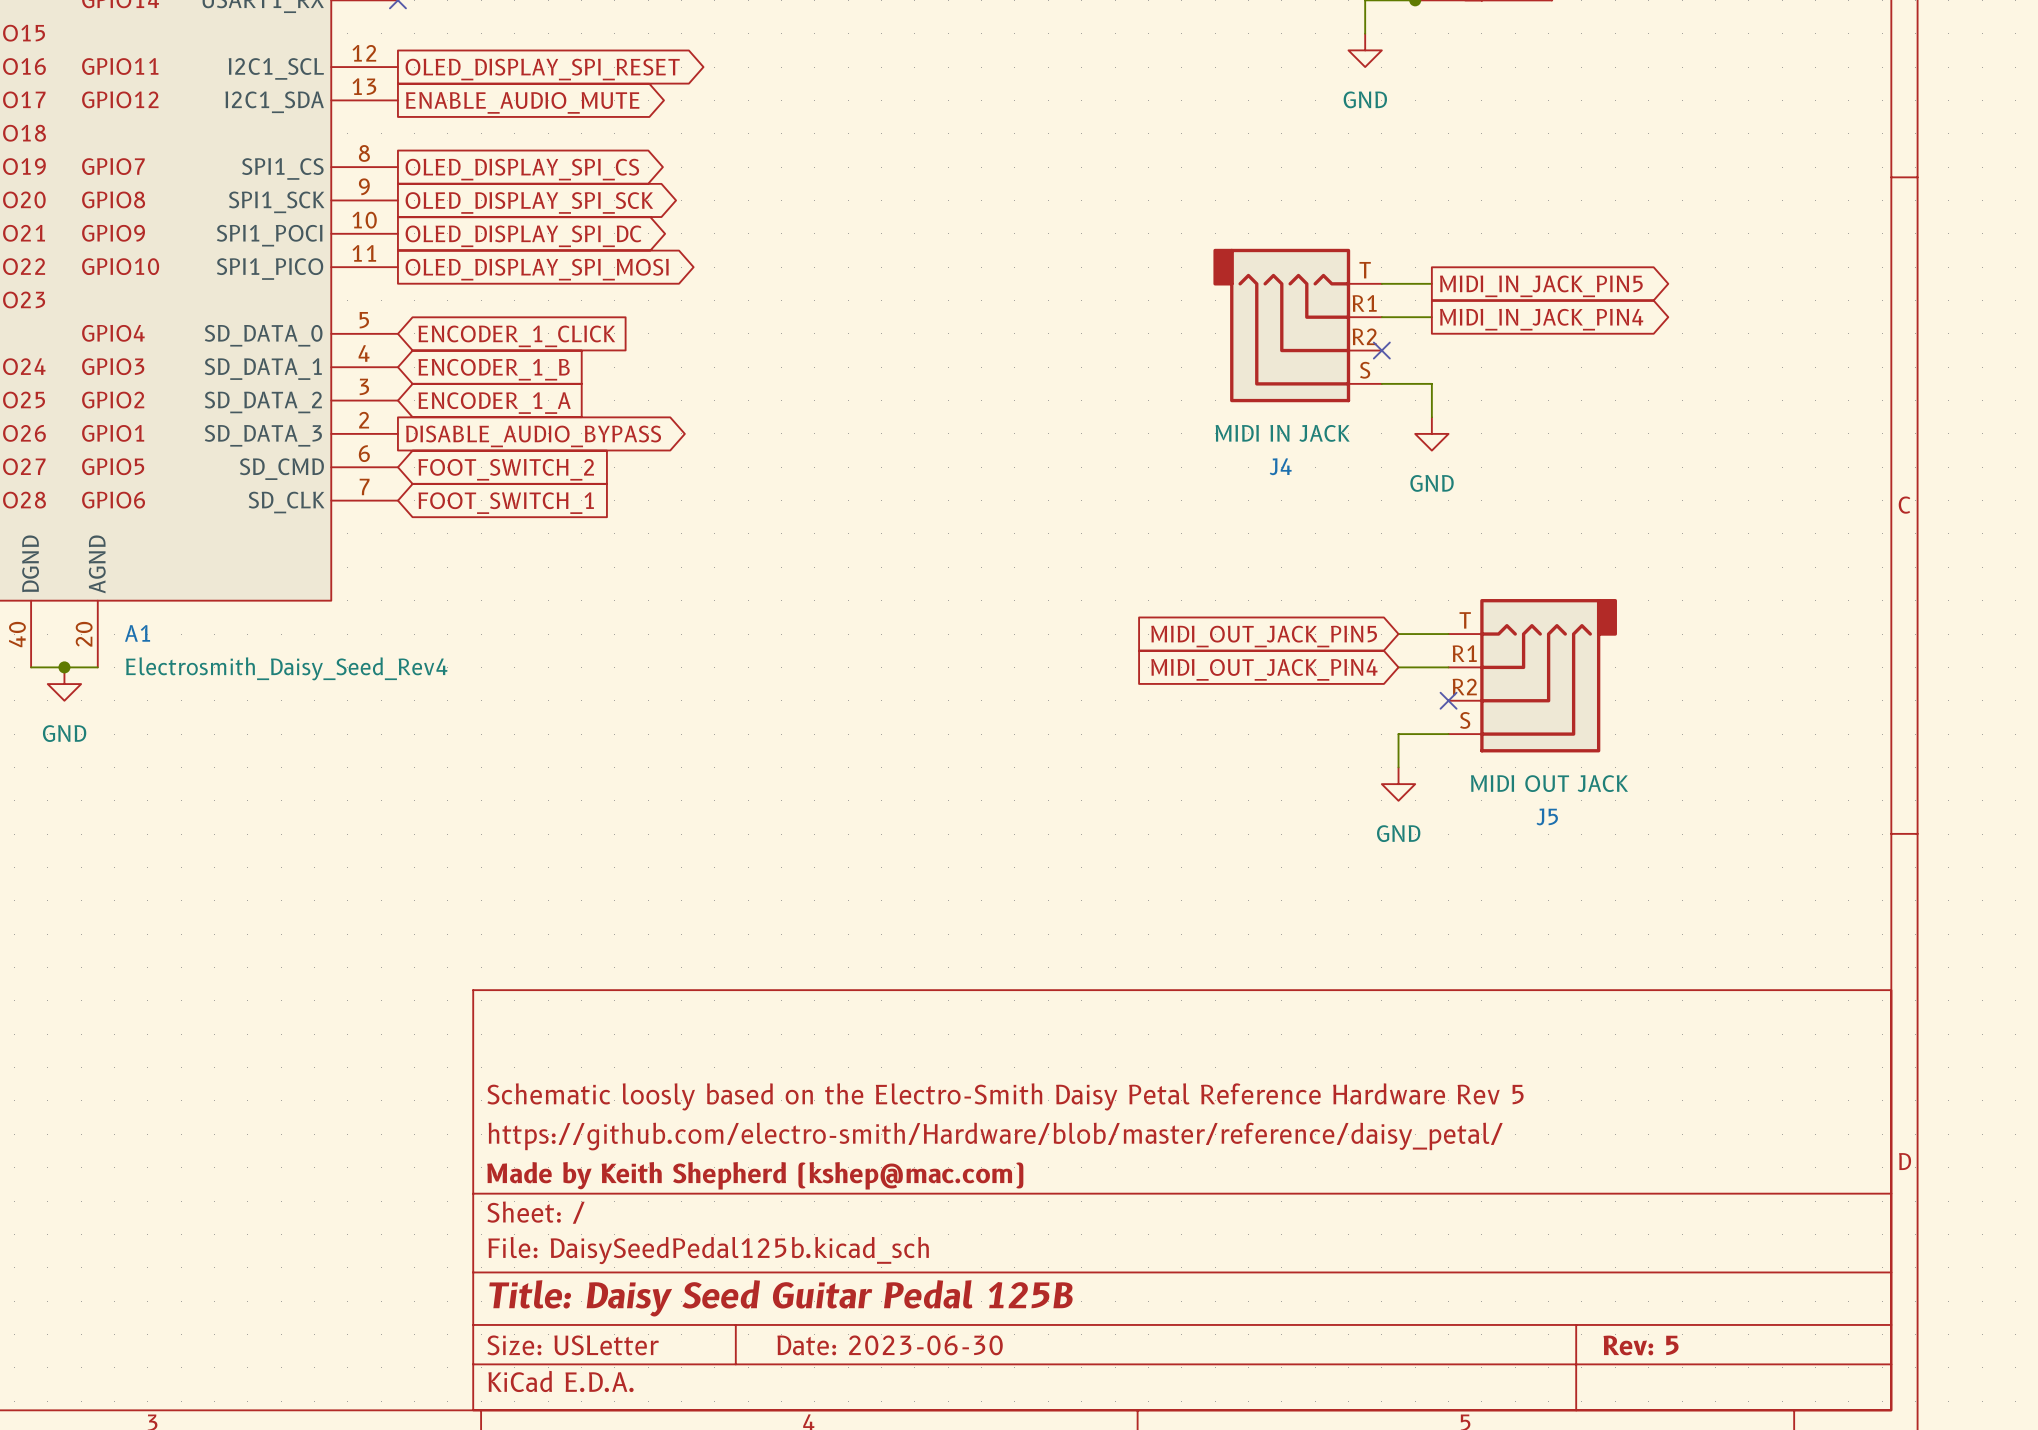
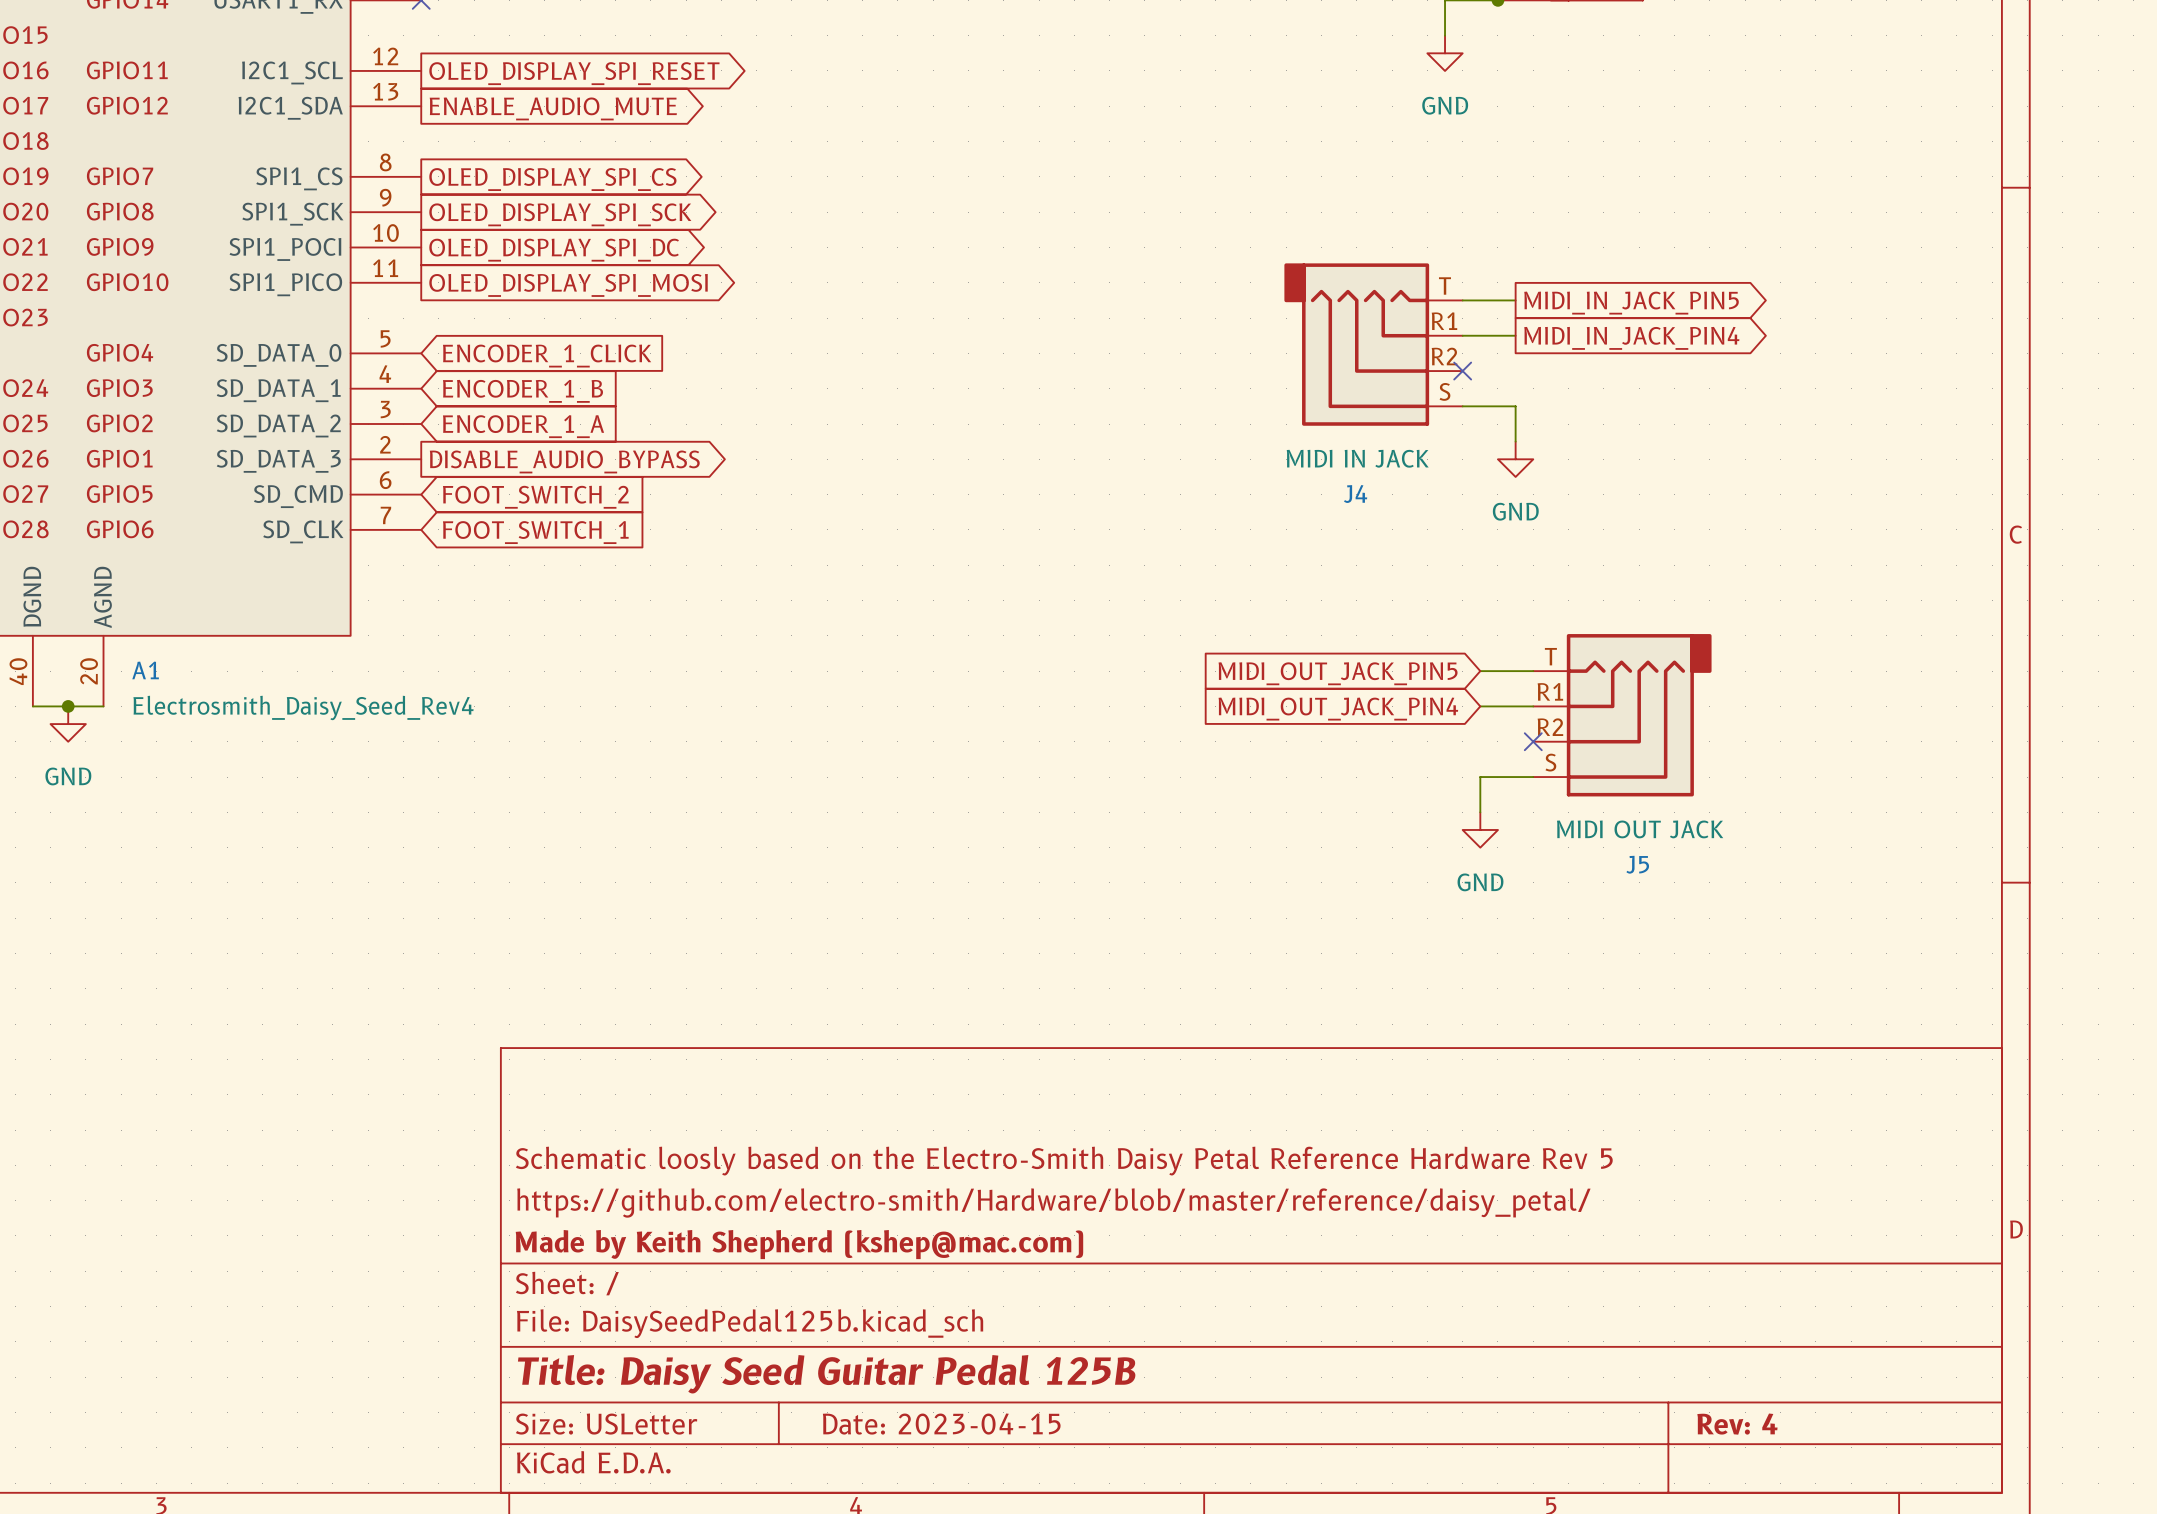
title block: Date: 2023-06-30 (890, 1345) -> Date: 2023-04-15 (941, 1424)
title block: Rev: 5 (1641, 1345) -> Rev: 4 (1737, 1424)

